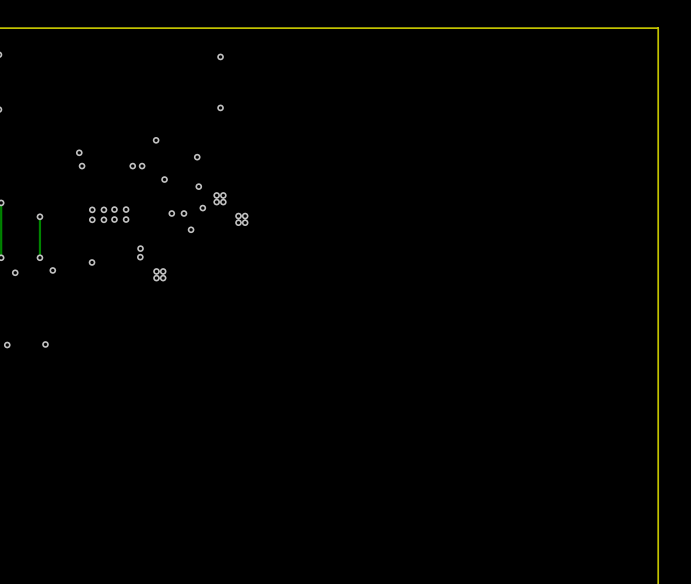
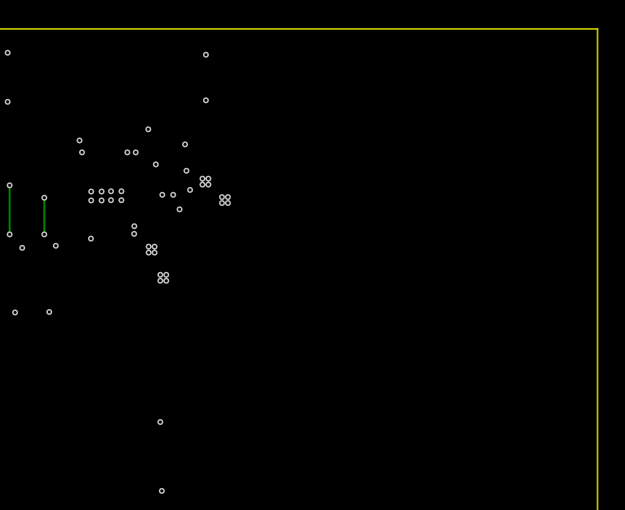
via: none -> (160, 274)
via: none -> (166, 274)
via: none -> (160, 280)
via: none -> (166, 280)
via: none -> (160, 422)
via: none -> (161, 490)

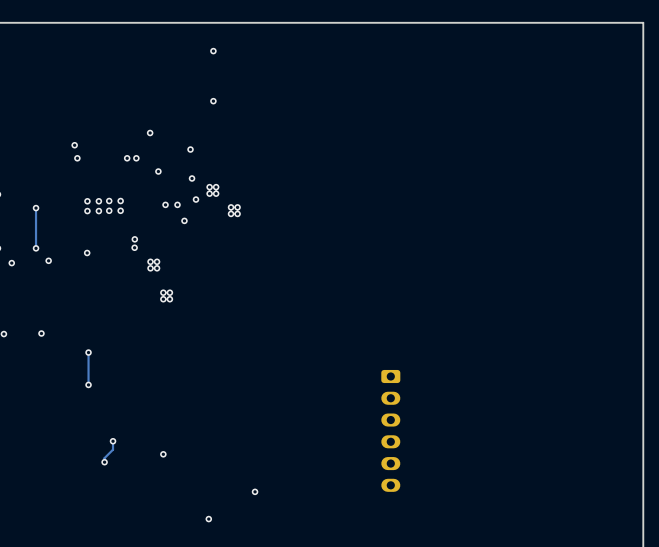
track: none -> (88, 352) (88, 384)
via: none -> (88, 352)
via: none -> (88, 384)
part: none -> (390, 430)
track: none -> (113, 441) (113, 449) (104, 458) (104, 462)
via: none -> (113, 441)
via: none -> (104, 462)
via: none -> (255, 491)
via position: (161, 490) -> (208, 519)

